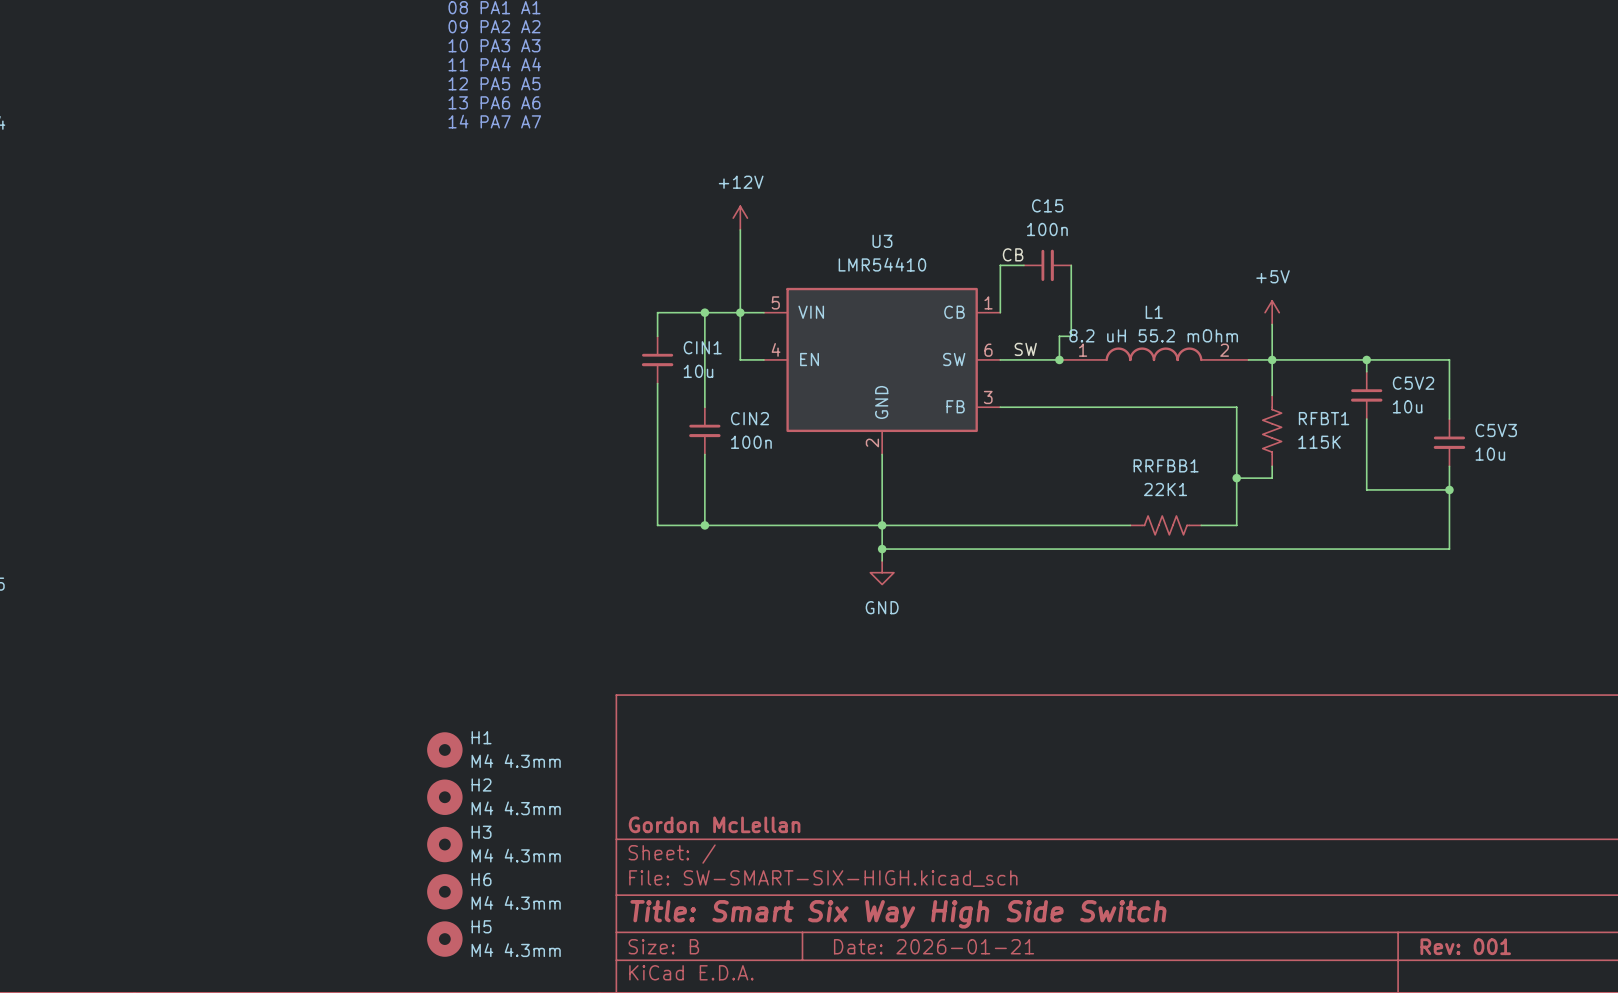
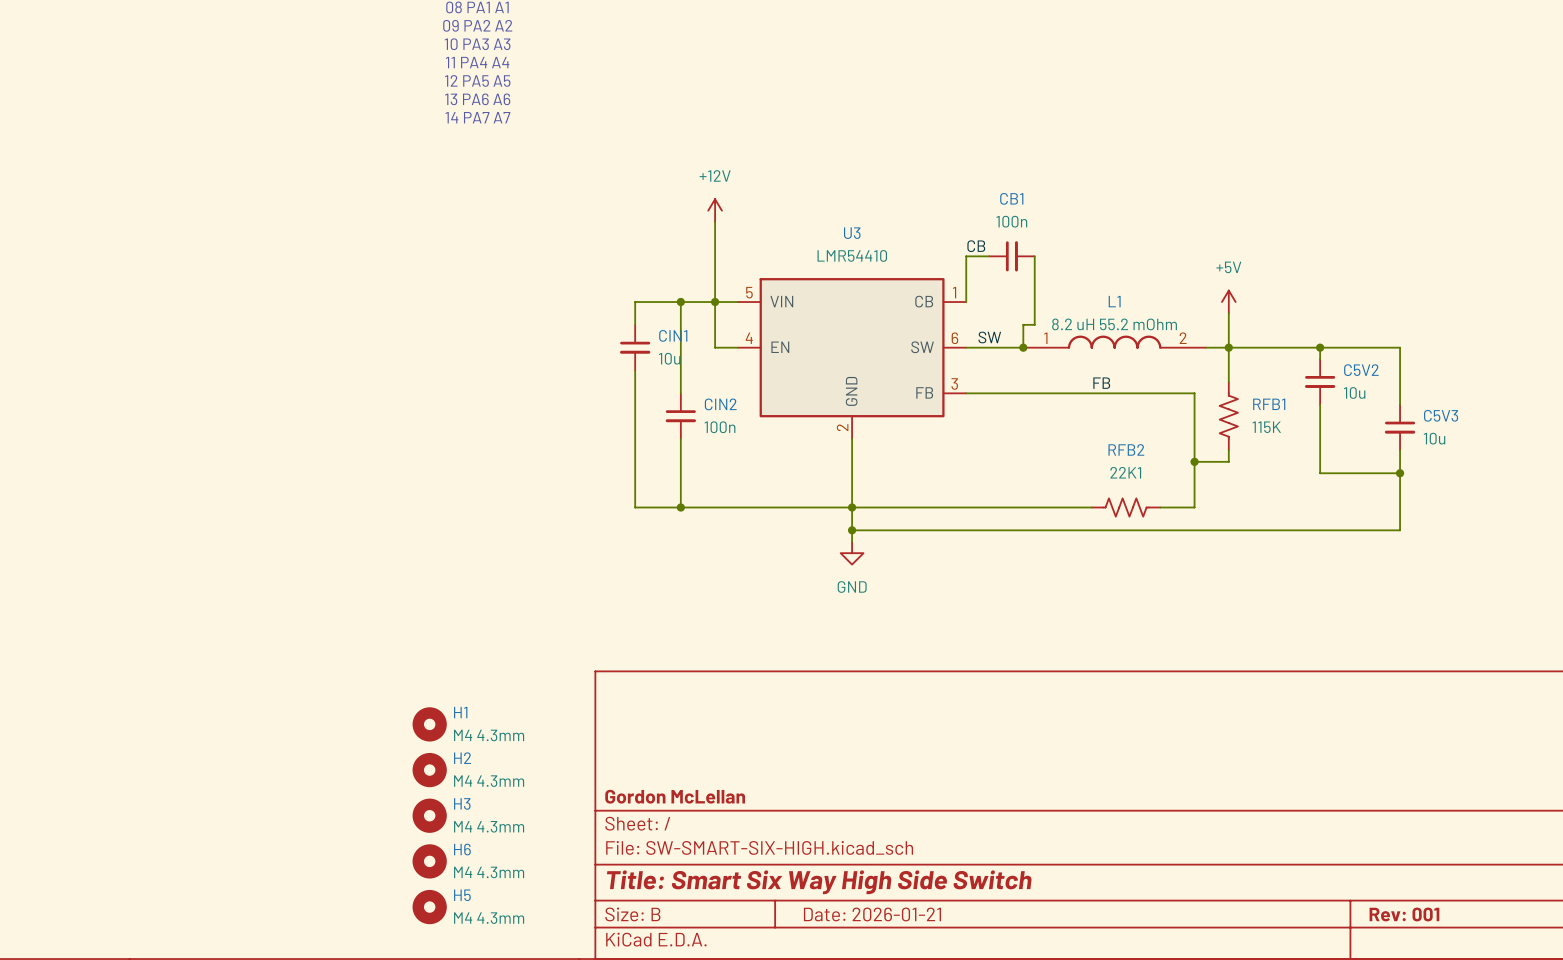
C15 name: C15 (1047, 205) -> CB1 (1011, 198)
label: none -> FB (1101, 383)
RFBT1 name: RFBT1 (1324, 418) -> RFB1 (1269, 404)
RRFBB1 name: RRFBB1 (1166, 465) -> RFB2 (1126, 449)

